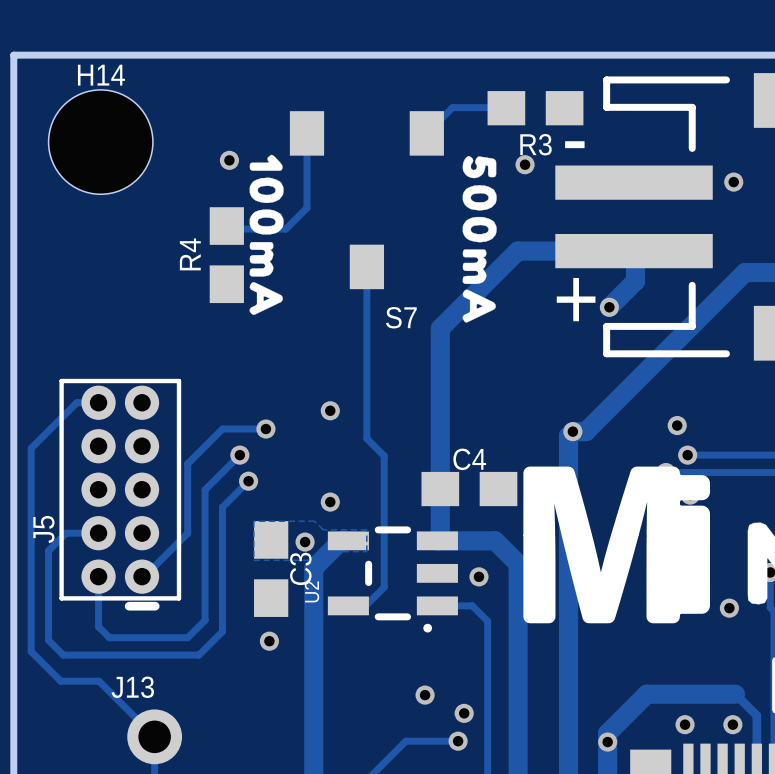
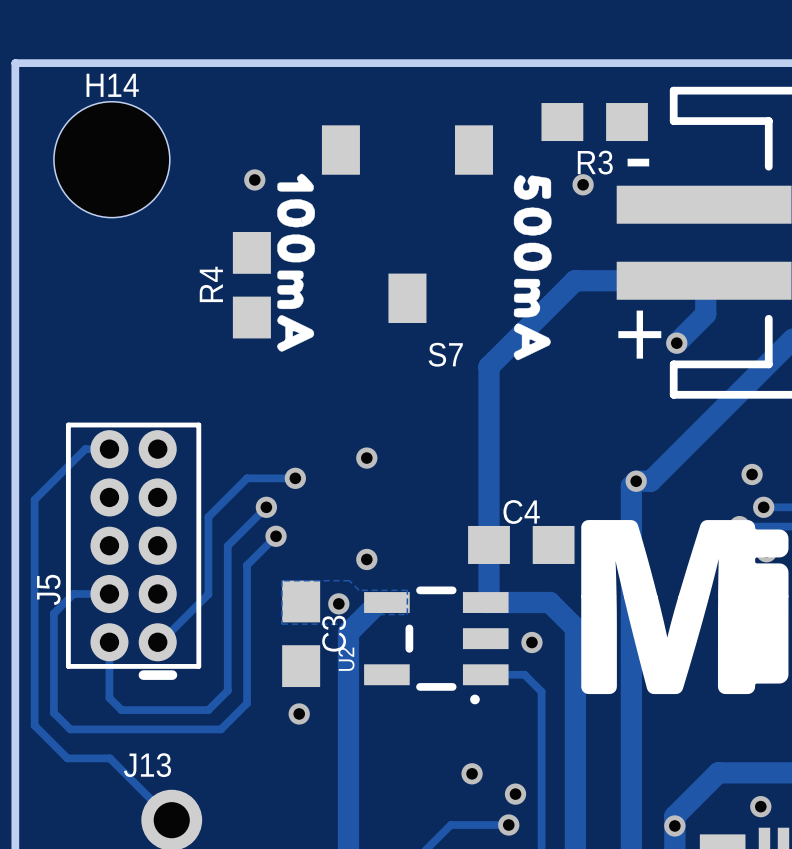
track: (505, 107) (452, 107) (426, 133) -> none
track: (306, 133) (306, 208) (285, 229) (229, 229) (226, 226) -> none
track: (366, 266) (366, 438) (384, 455) (384, 587) (365, 605) (348, 605) -> none

